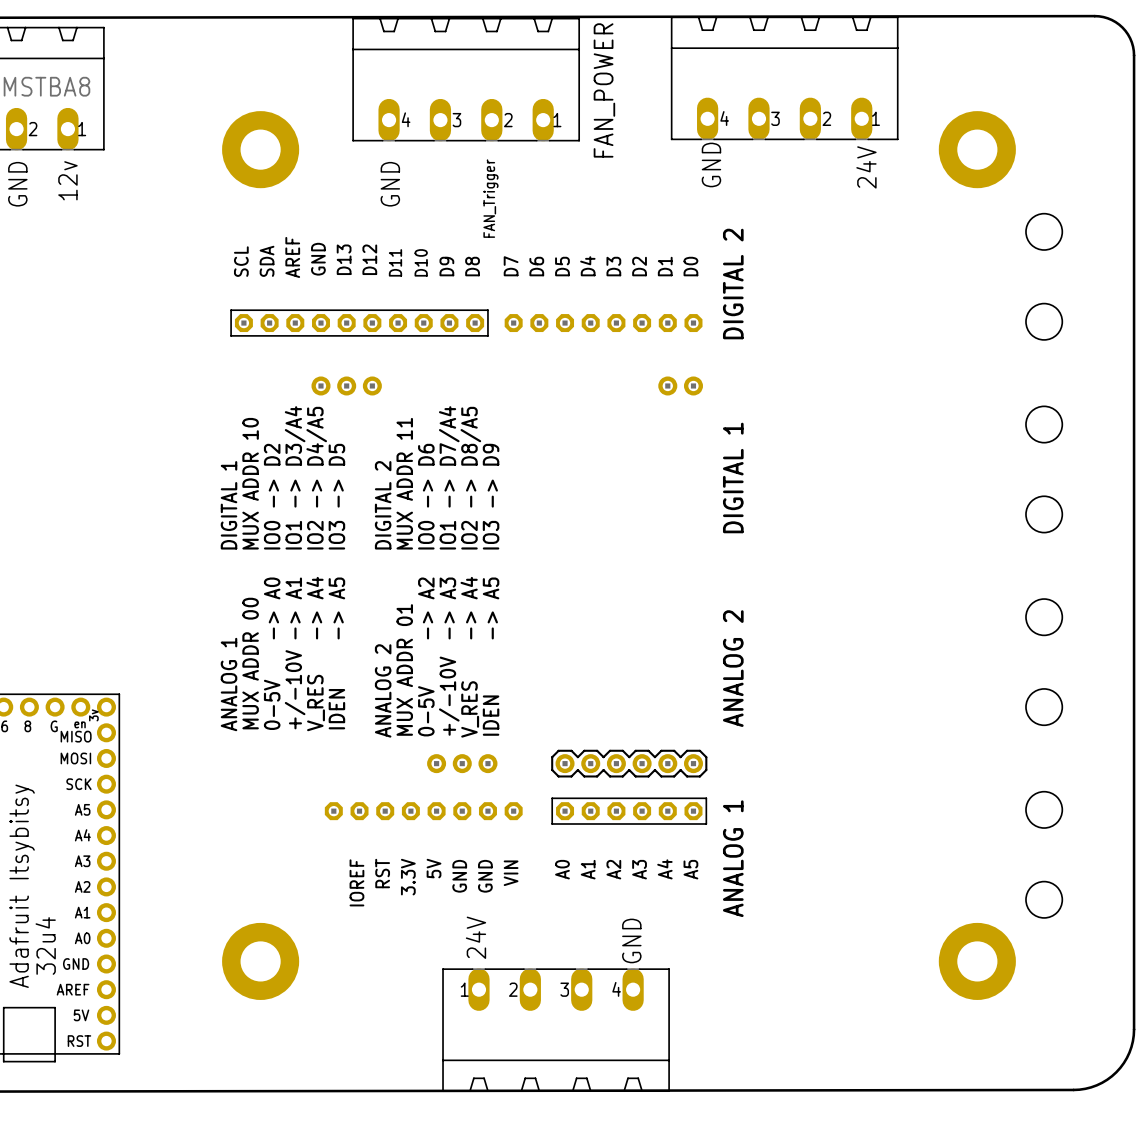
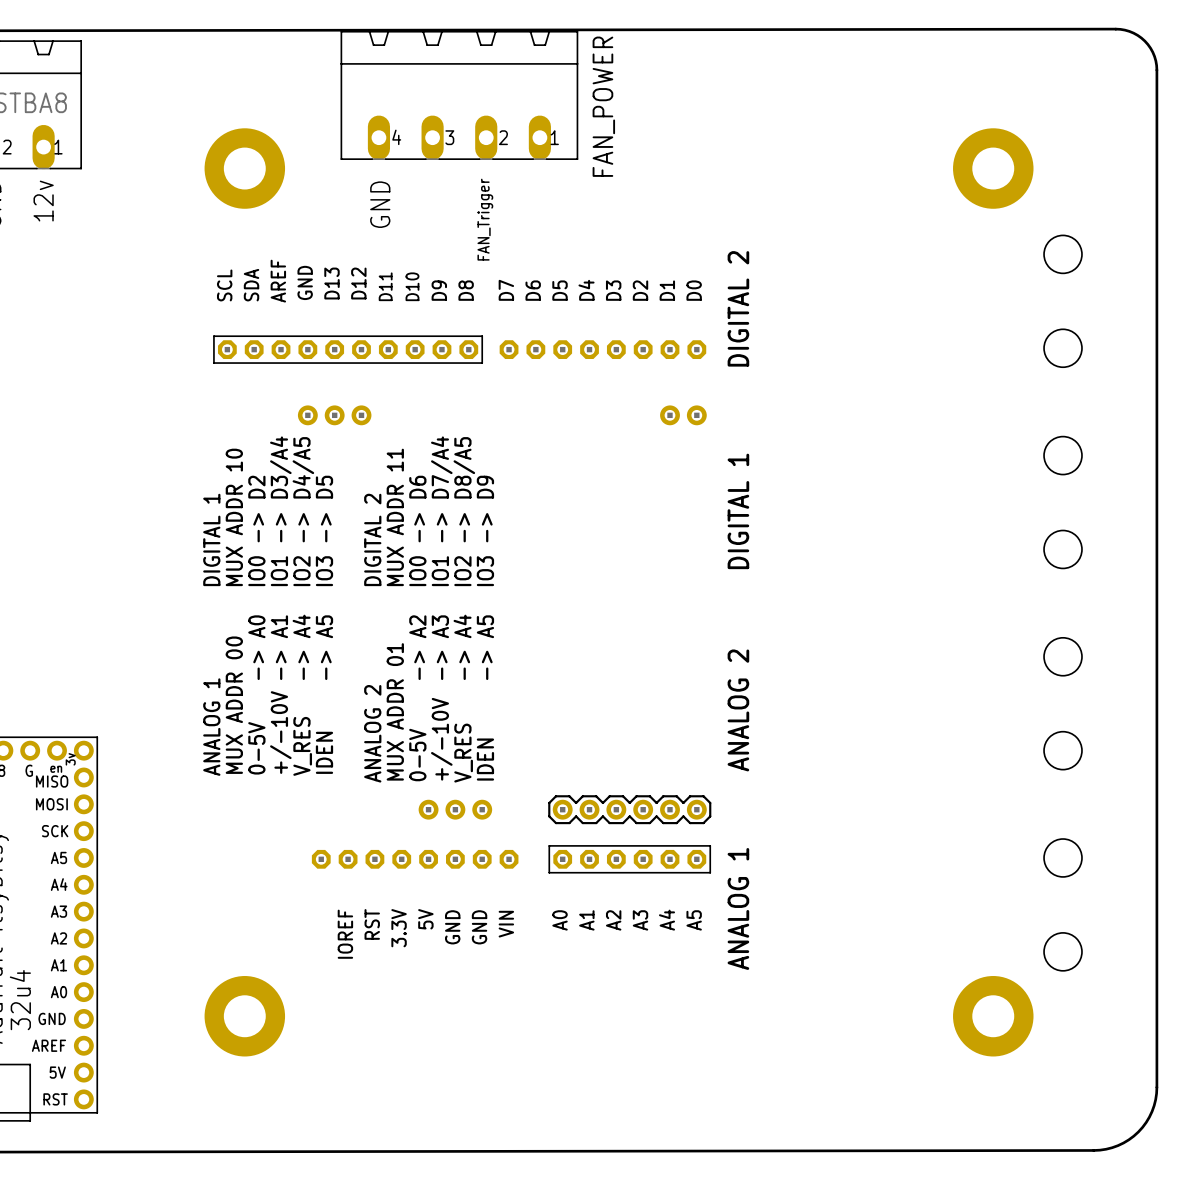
part: (784, 78) -> none
text: GND (711, 164) -> none
text: 24V (866, 167) -> none
text: 24V (475, 937) -> none
text: GND (631, 940) -> none
part: (556, 1030) -> none

